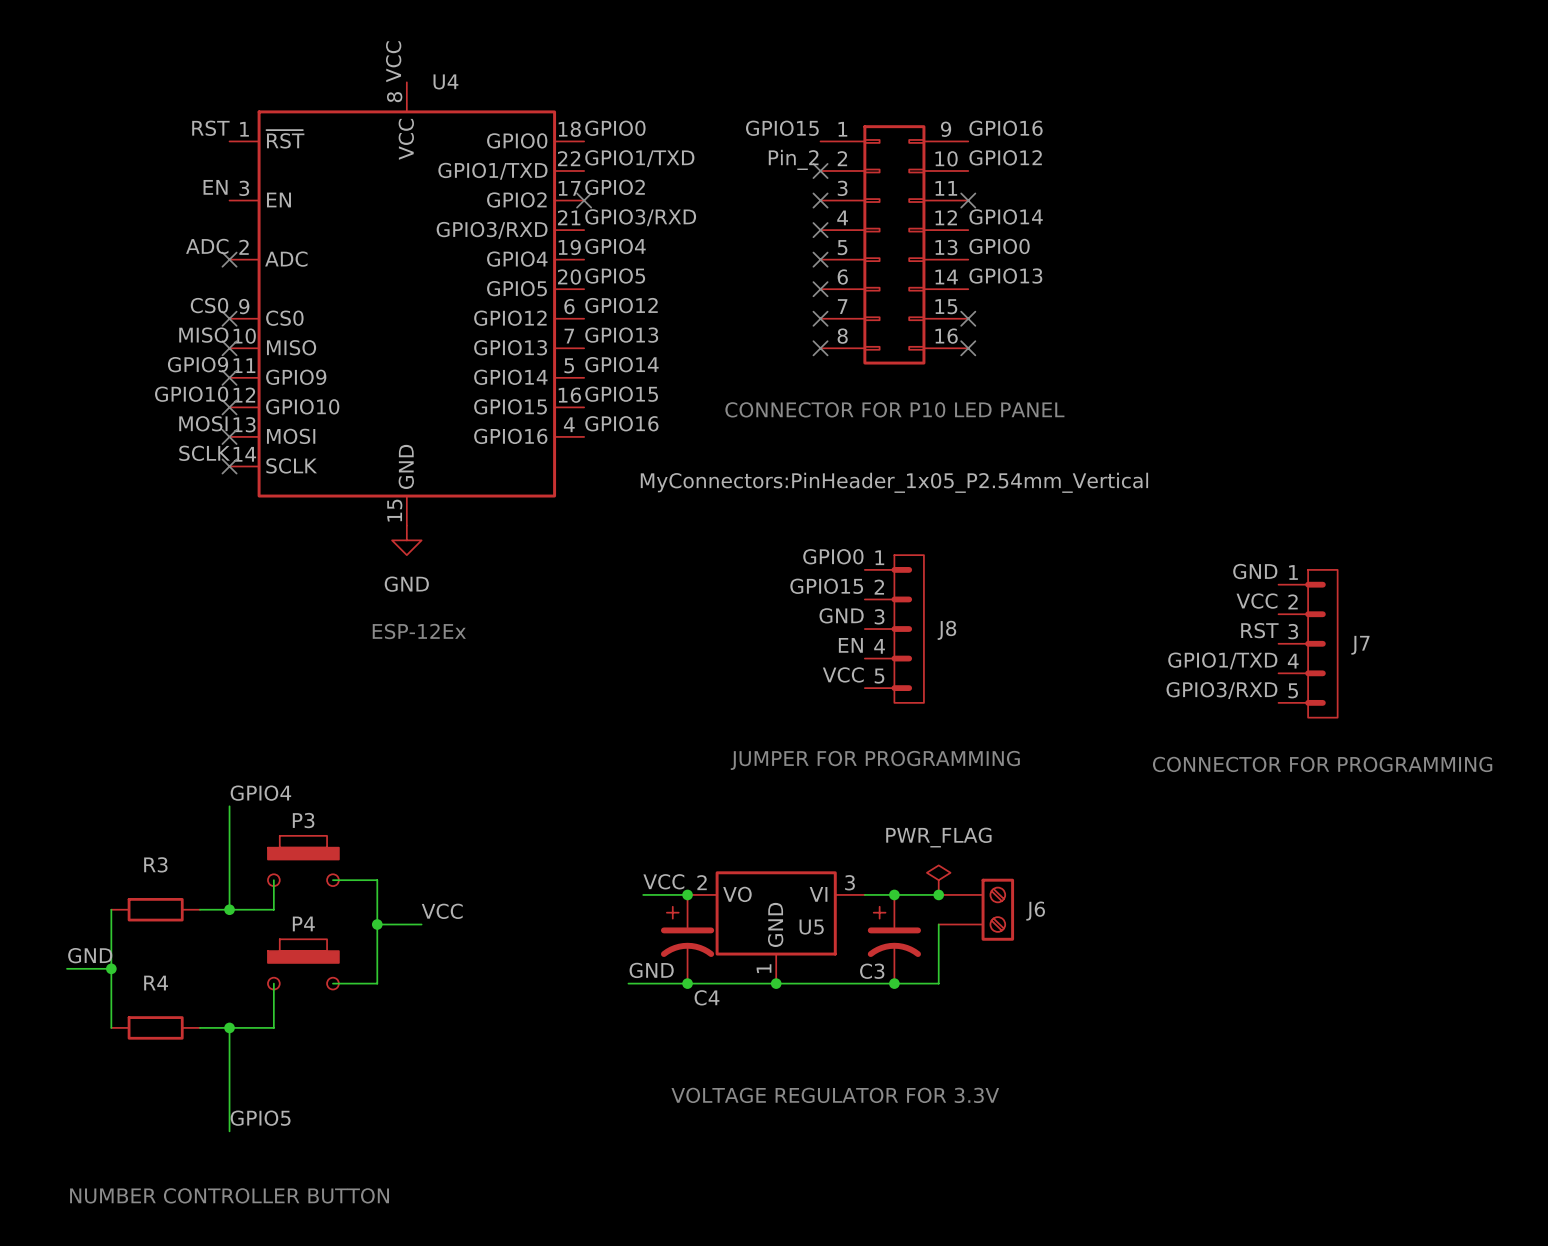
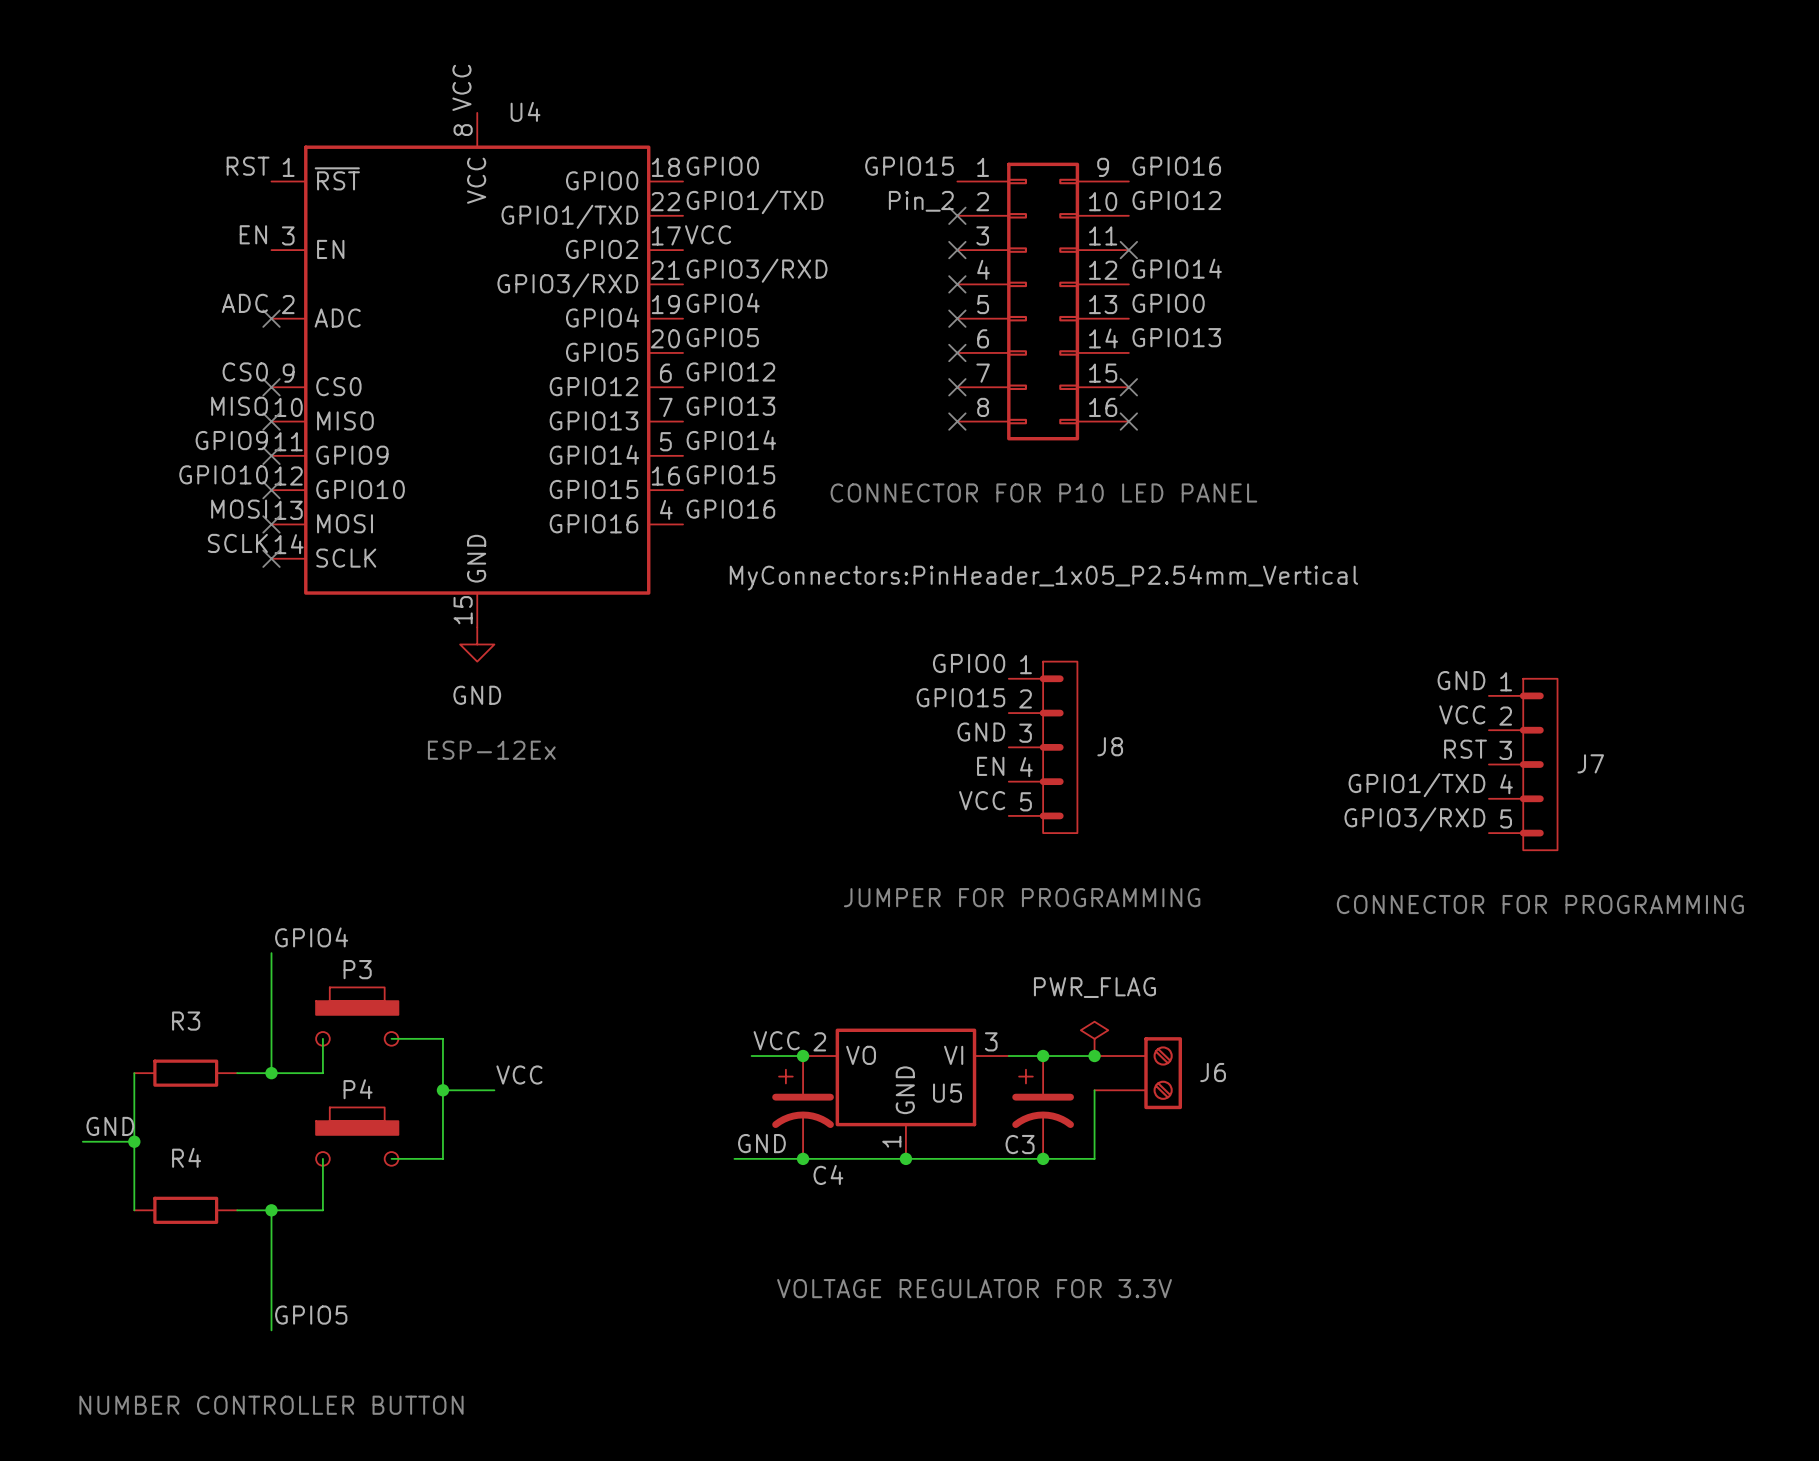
label: GPIO2 (615, 187) -> VCC (708, 234)
no-connect mark: (584, 200) -> none

